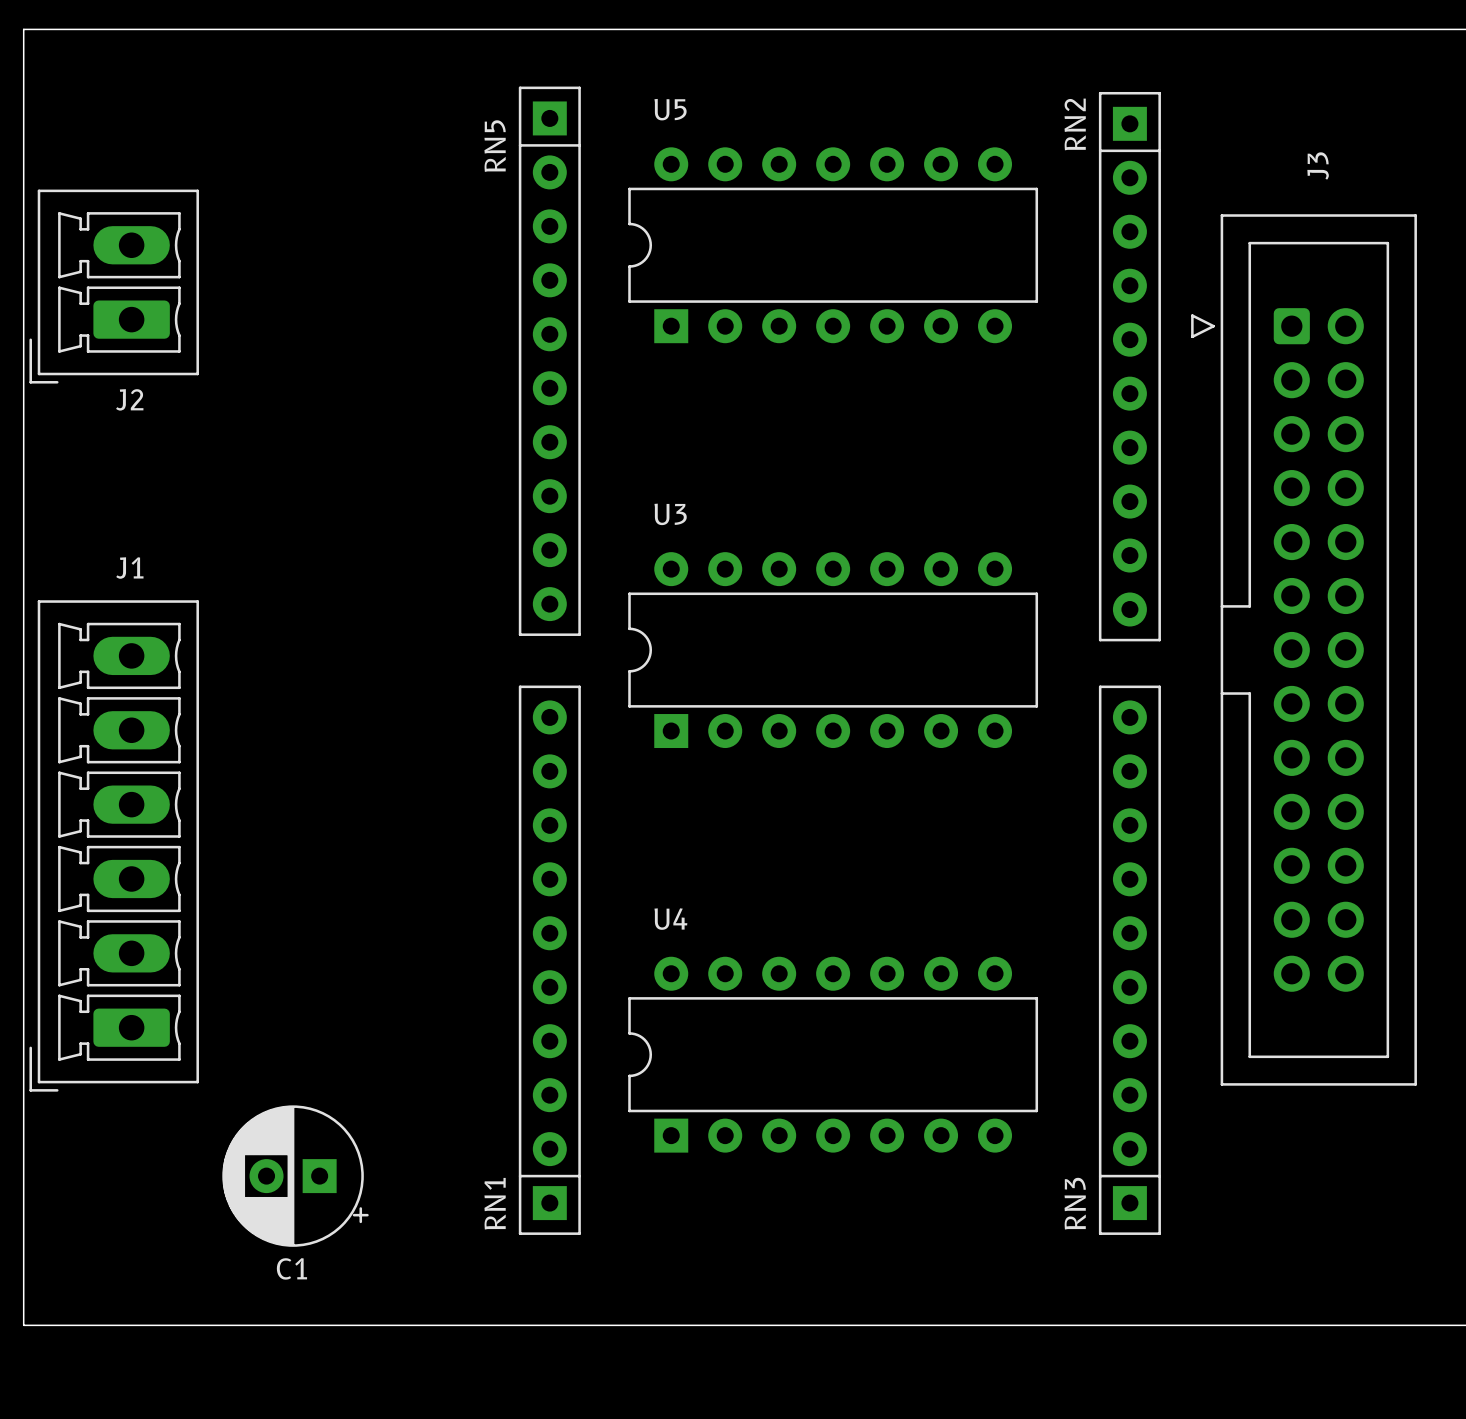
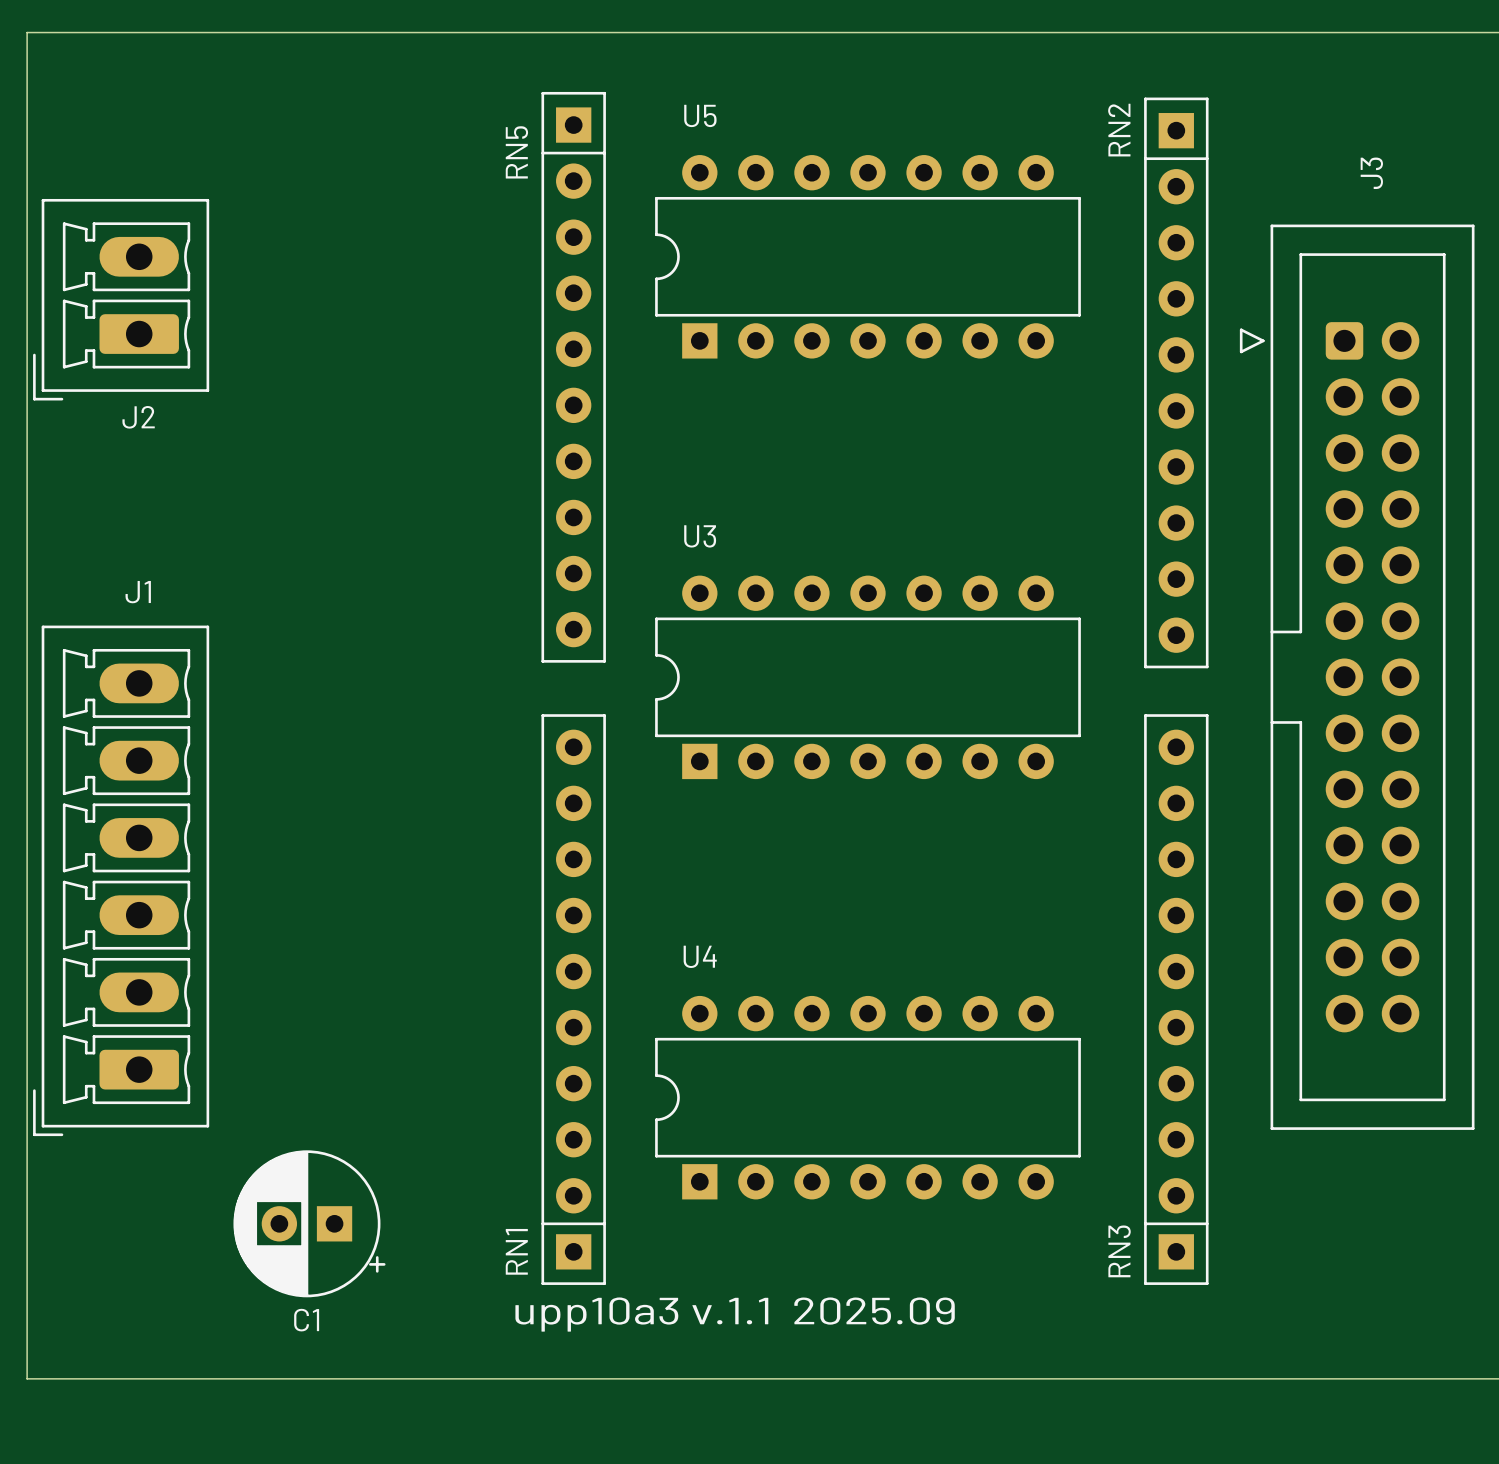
text: none -> upp10a3 v.1.1 2025.09 (735, 1314)

